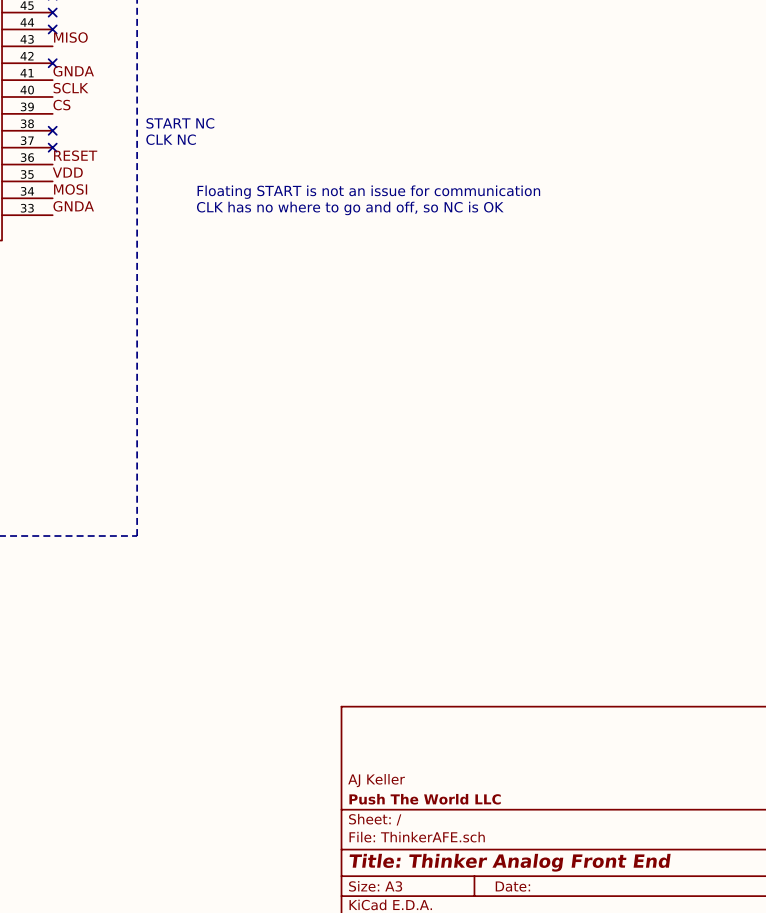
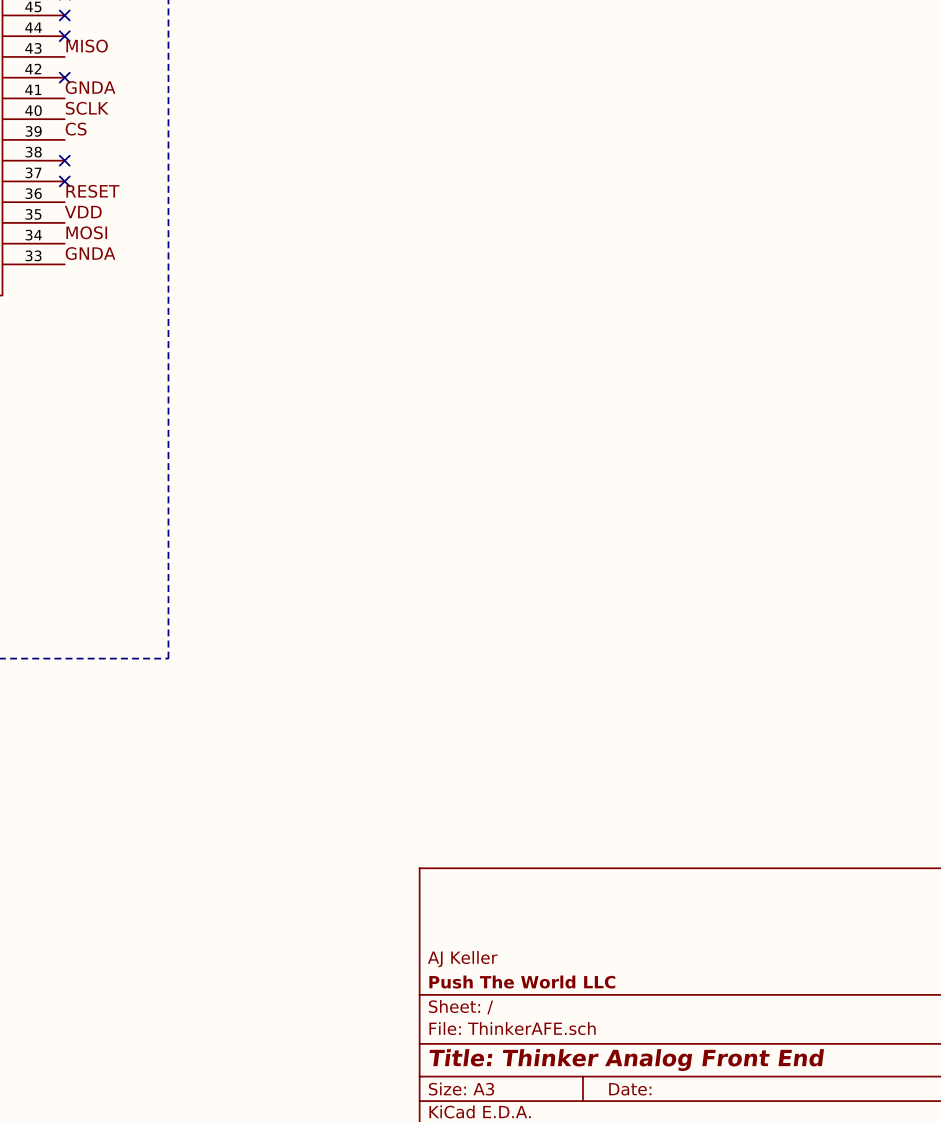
text: START NC (180, 123) -> none
text: CLK NC (171, 139) -> none
text: Floating START is not an issue for communication (368, 192) -> none
text: CLK has no where to go and off, so NC is OK (350, 208) -> none

